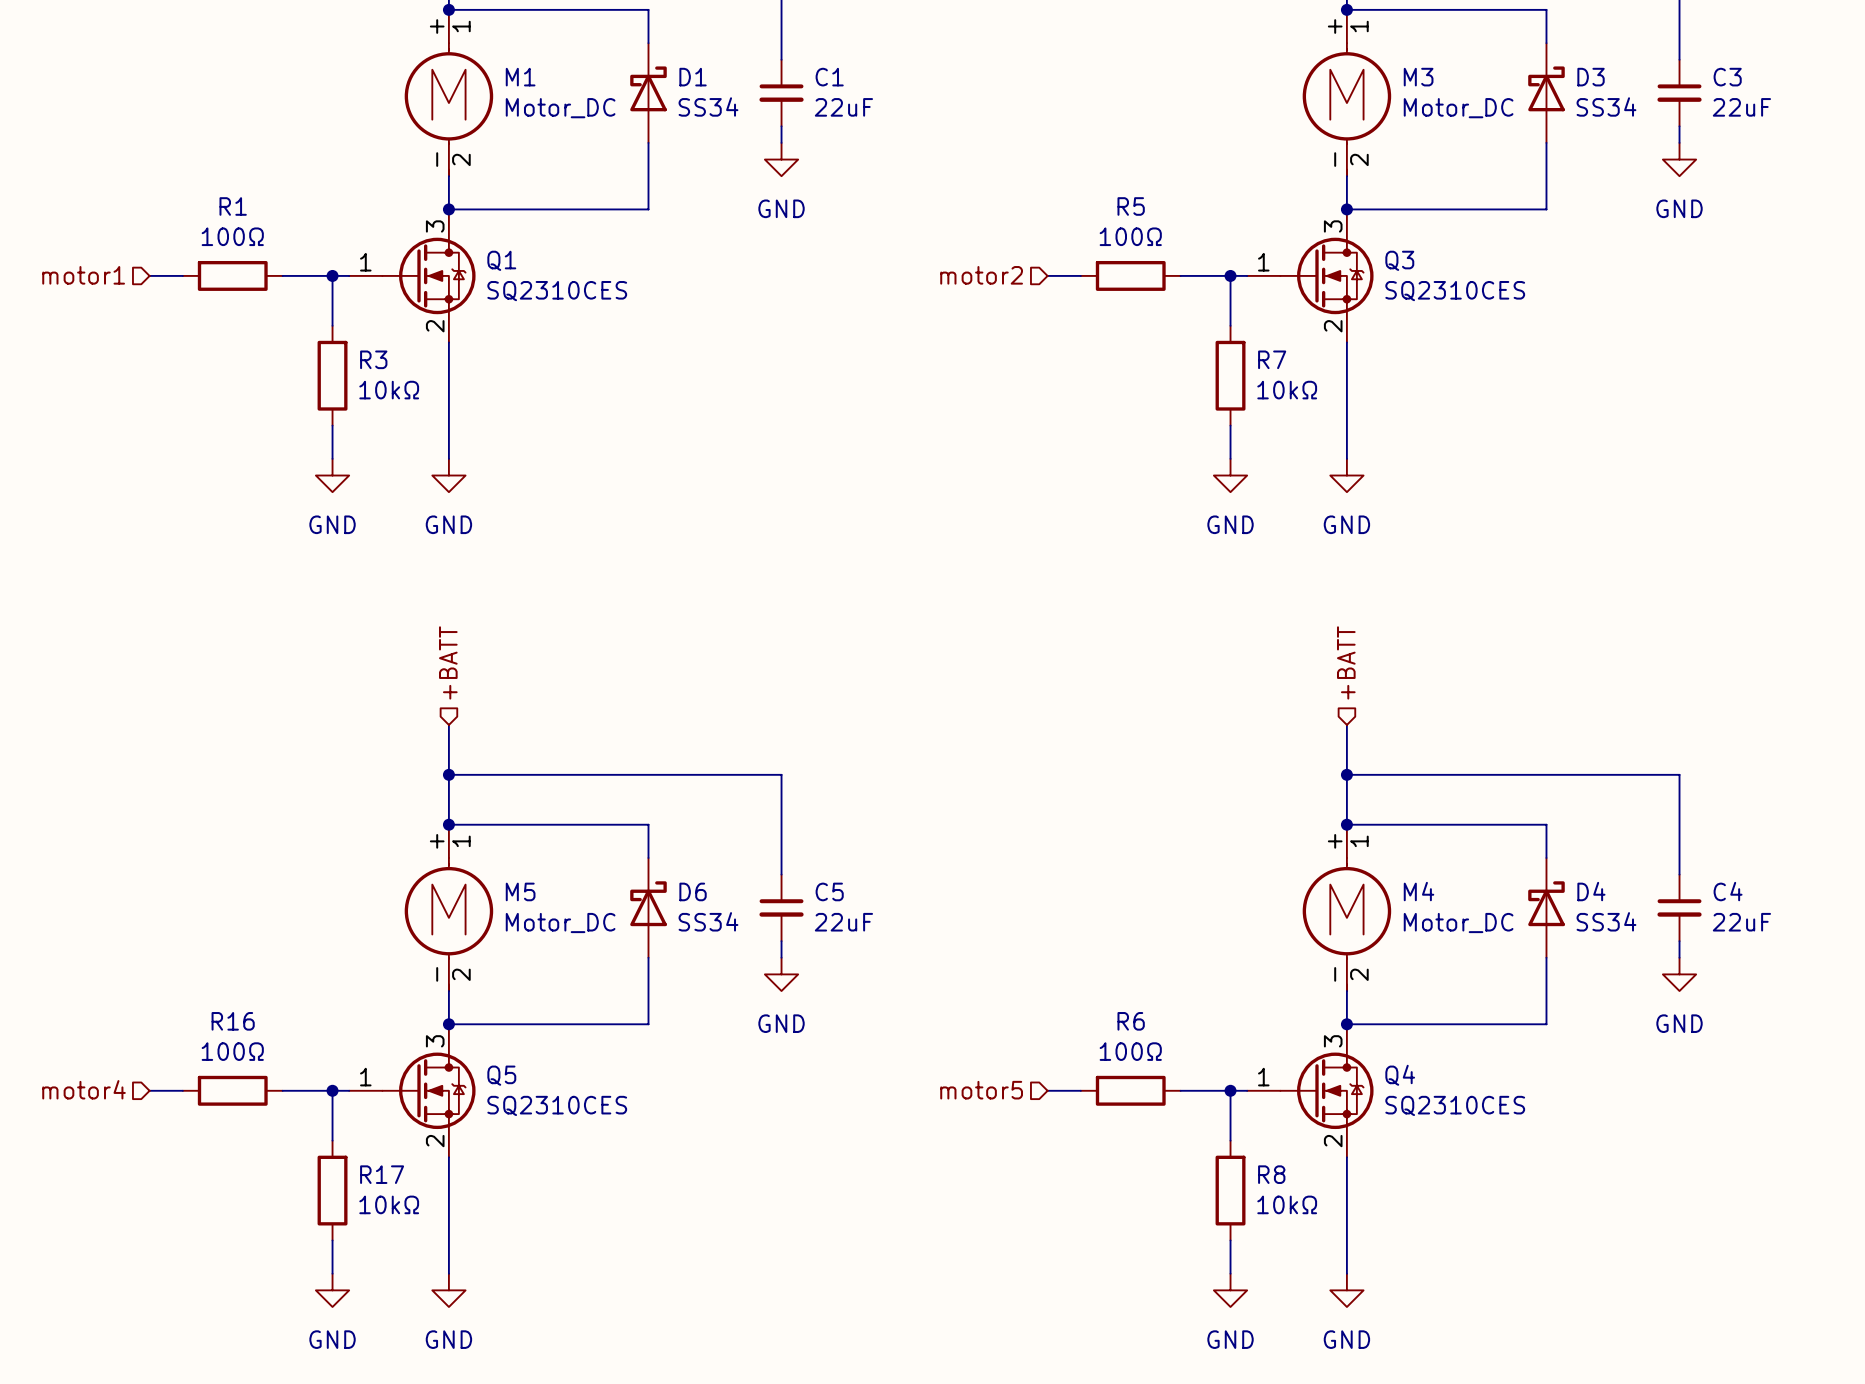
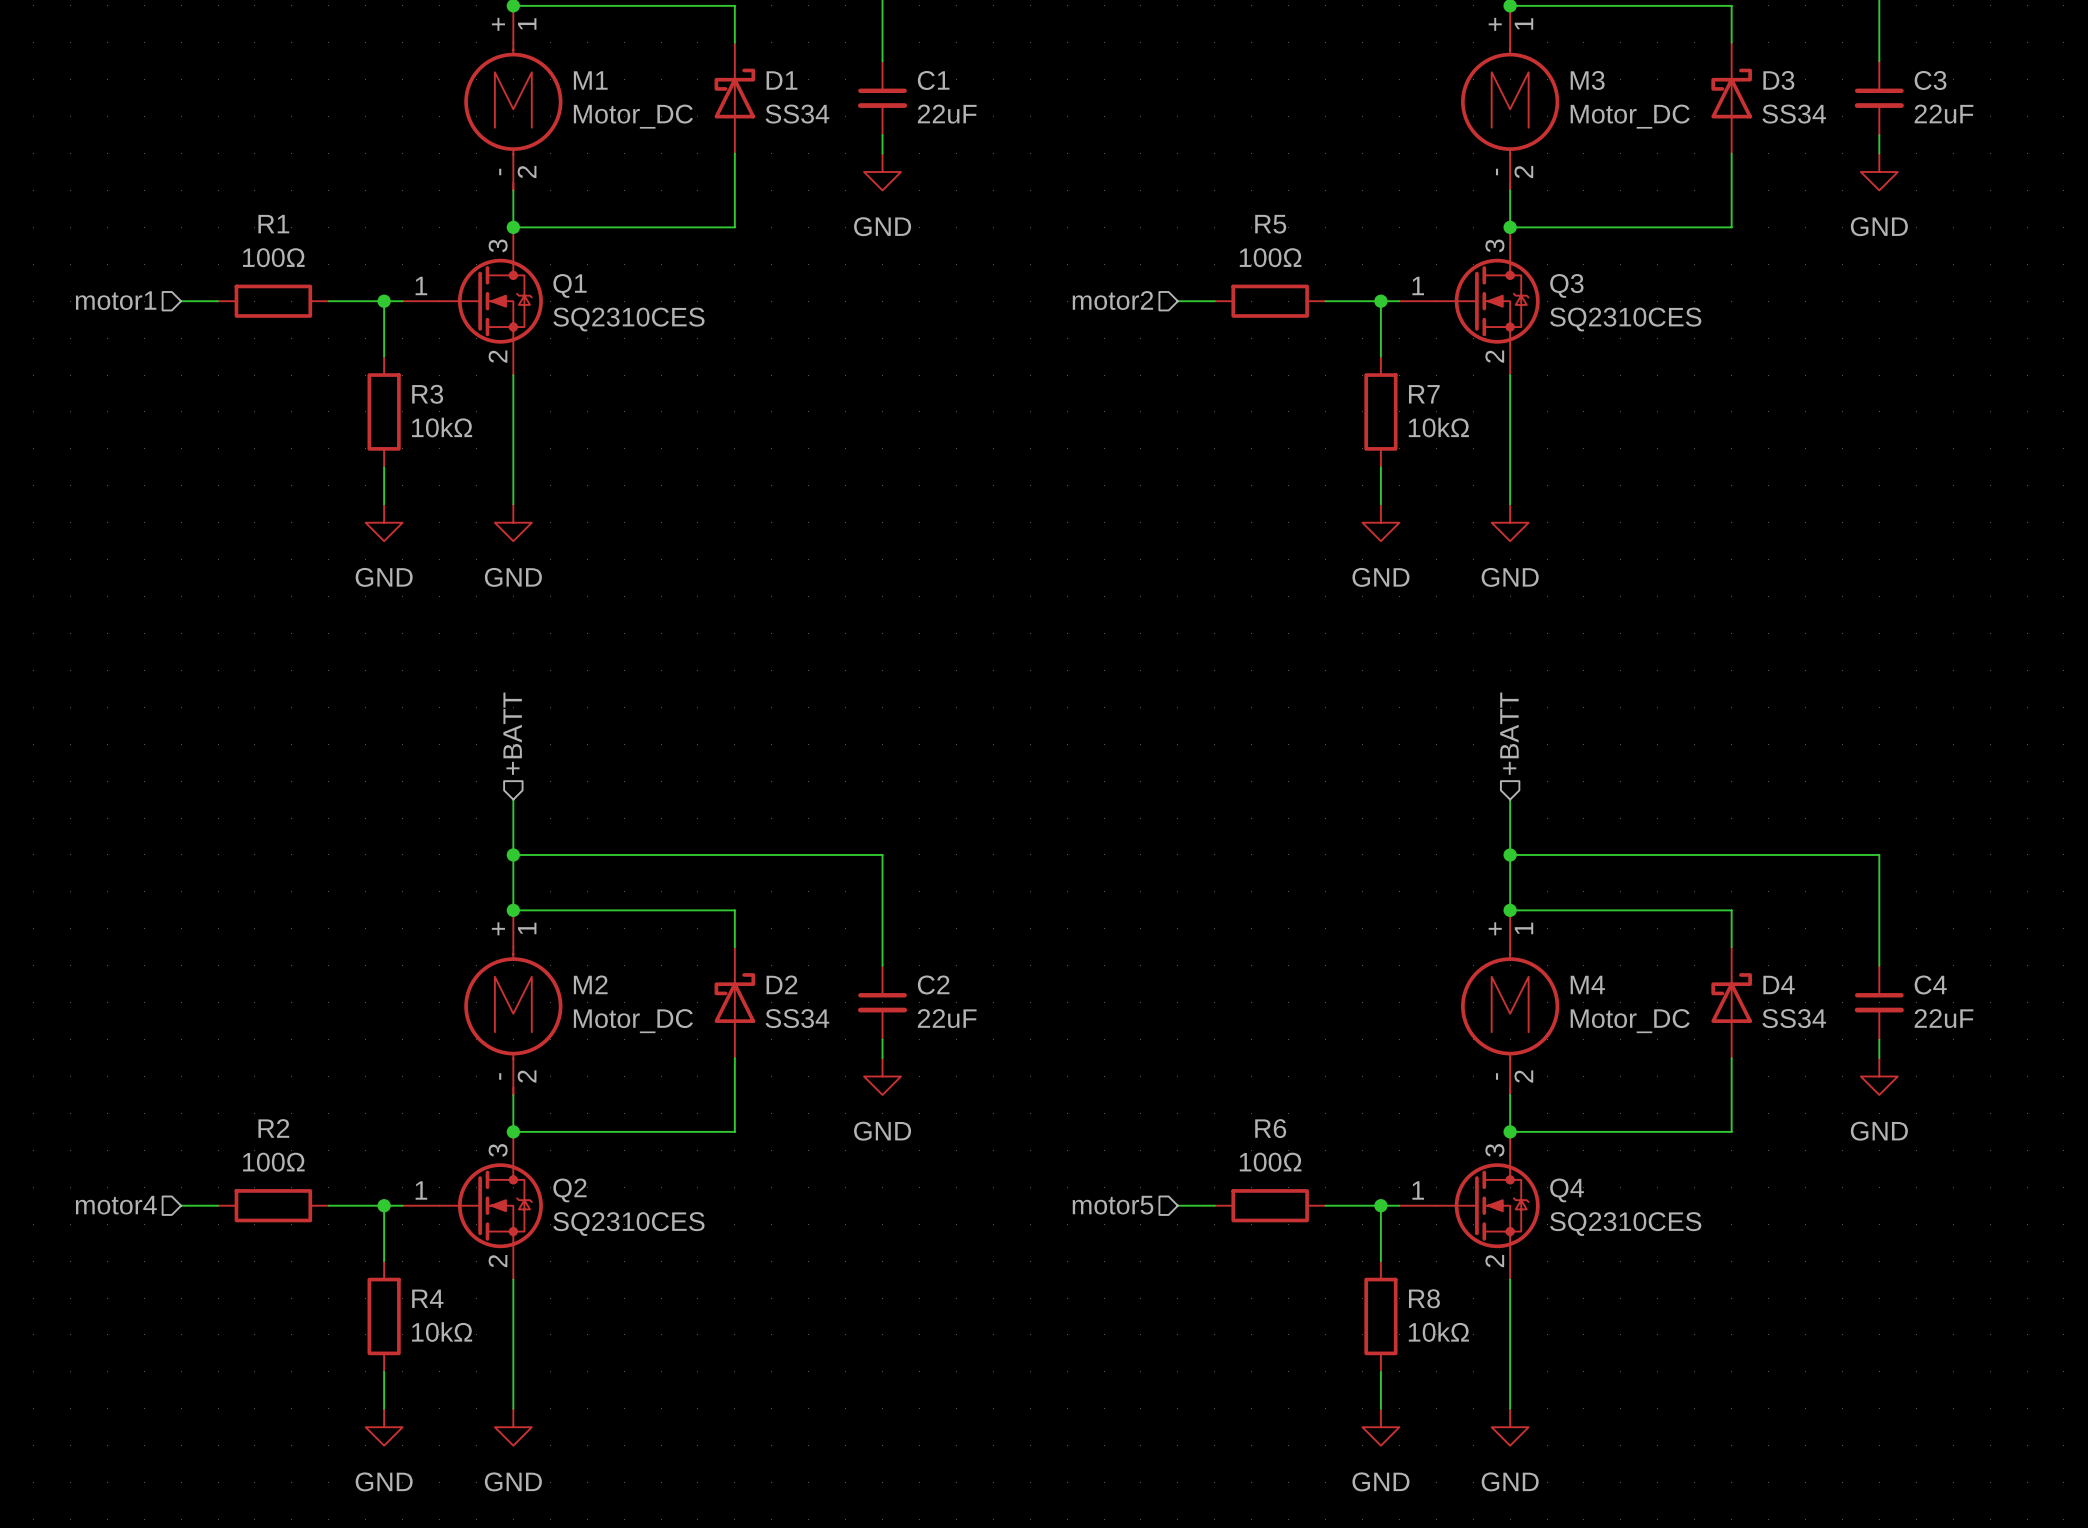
M5 name: M5 (520, 891) -> M2 (590, 984)
D6 name: D6 (693, 891) -> D2 (781, 984)
C5 name: C5 (829, 891) -> C2 (933, 984)
R16 name: R16 (233, 1021) -> R2 (273, 1128)
Q5 name: Q5 (501, 1075) -> Q2 (569, 1190)
R17 name: R17 (382, 1174) -> R4 (427, 1298)

